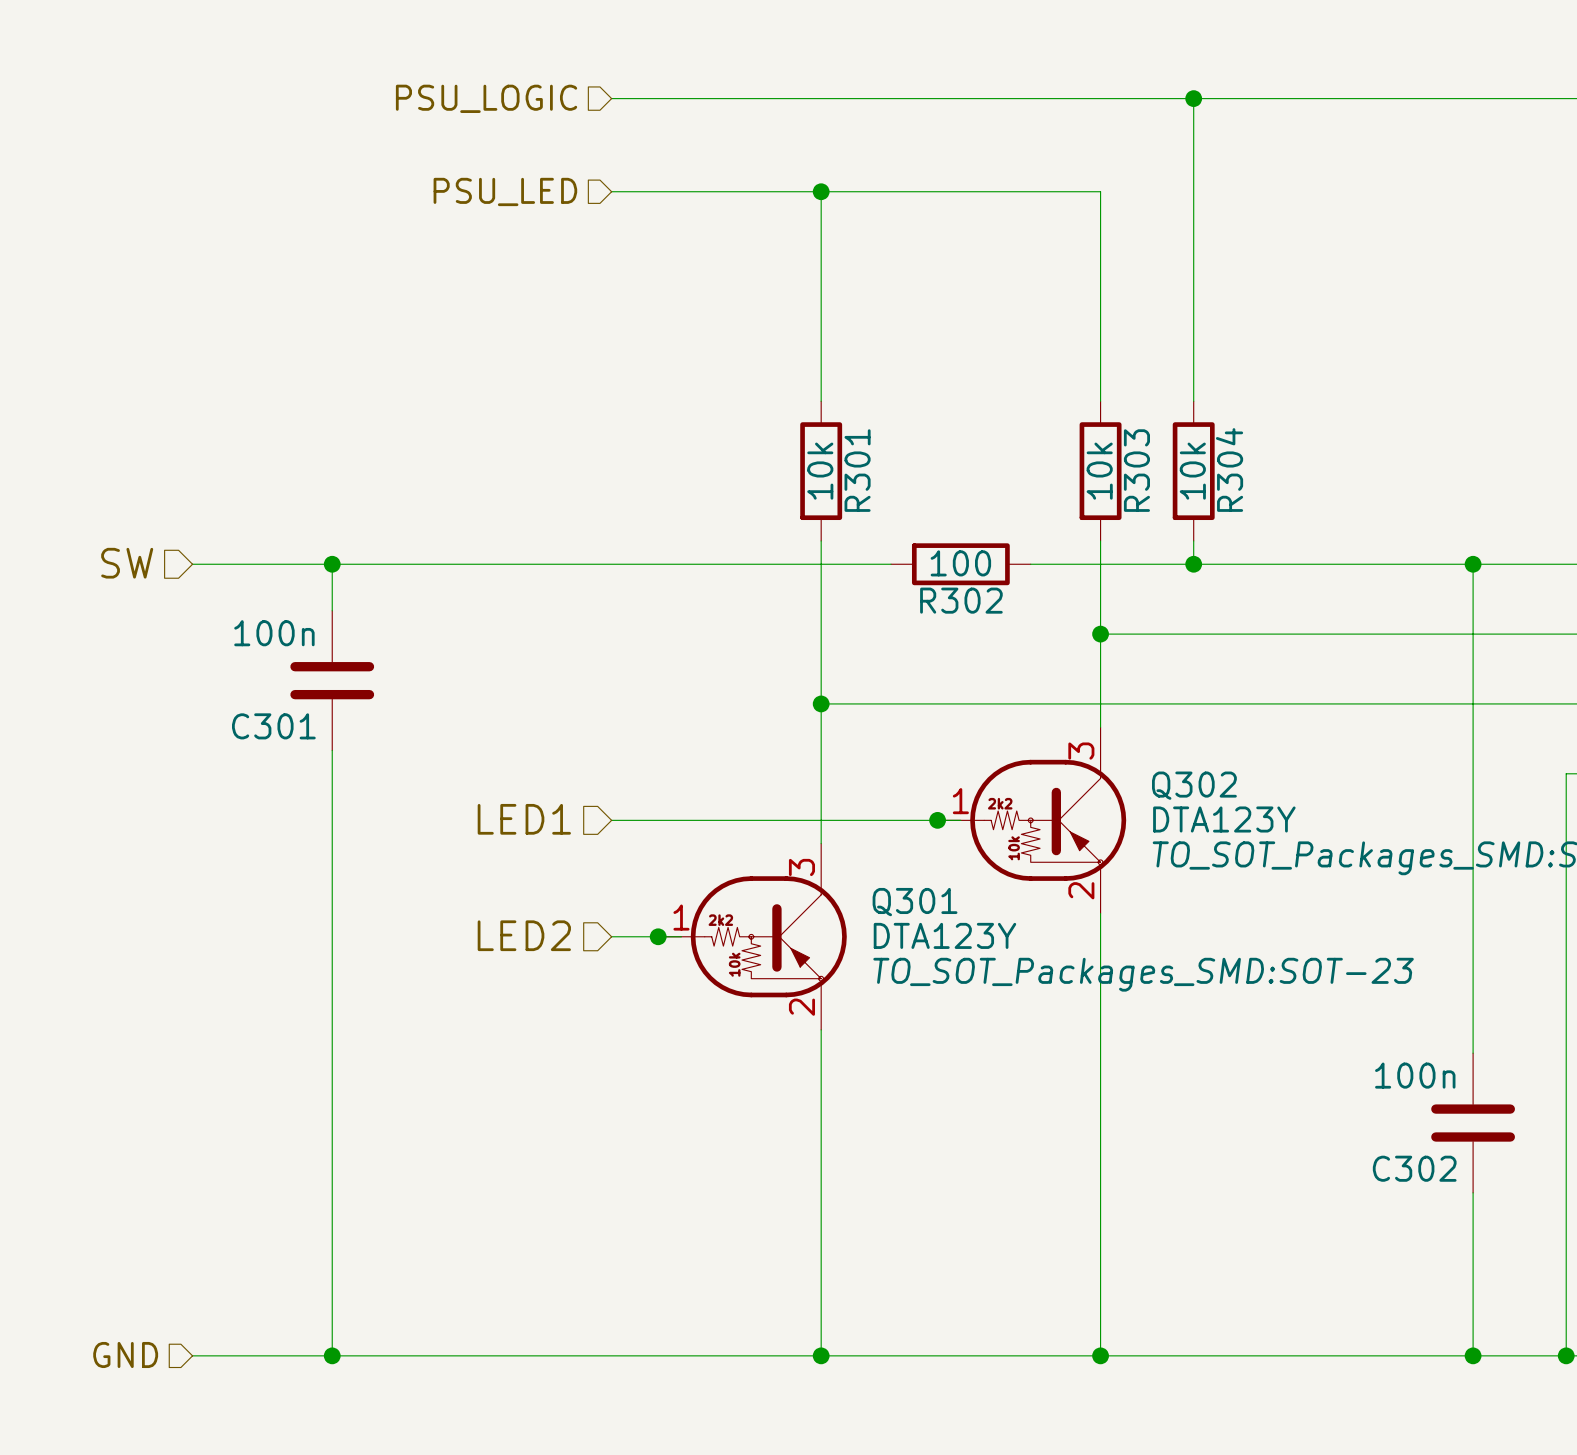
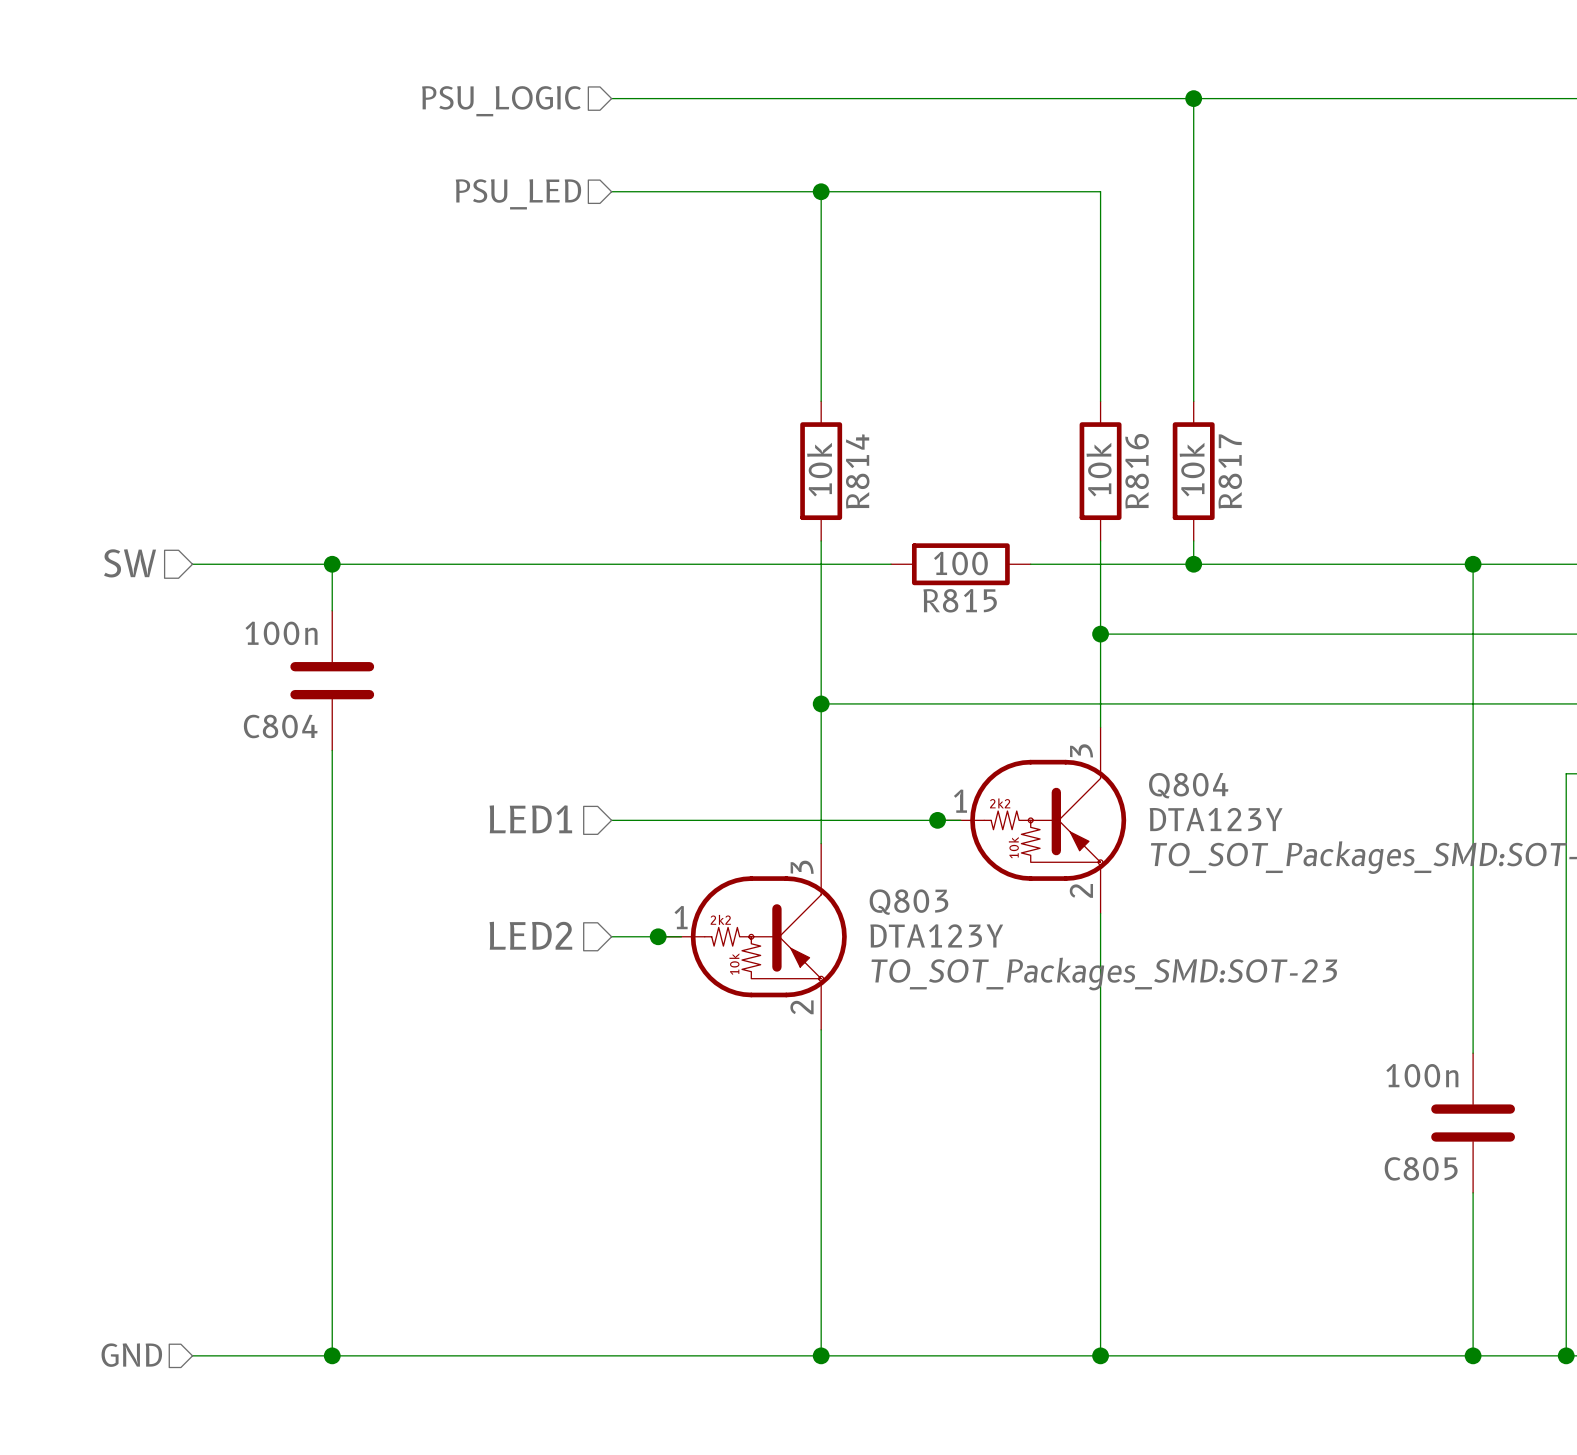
R301 name: R301 (857, 470) -> R814 (857, 471)
R303 name: R303 (1136, 470) -> R816 (1137, 471)
R304 name: R304 (1229, 470) -> R817 (1230, 471)
R302 name: R302 (961, 600) -> R815 (960, 600)
C301 name: C301 (273, 726) -> C804 (280, 726)
Q302 name: Q302 (1194, 785) -> Q804 (1188, 785)
Q301 name: Q301 (915, 902) -> Q803 (908, 902)
C302 name: C302 (1414, 1168) -> C805 (1421, 1168)

